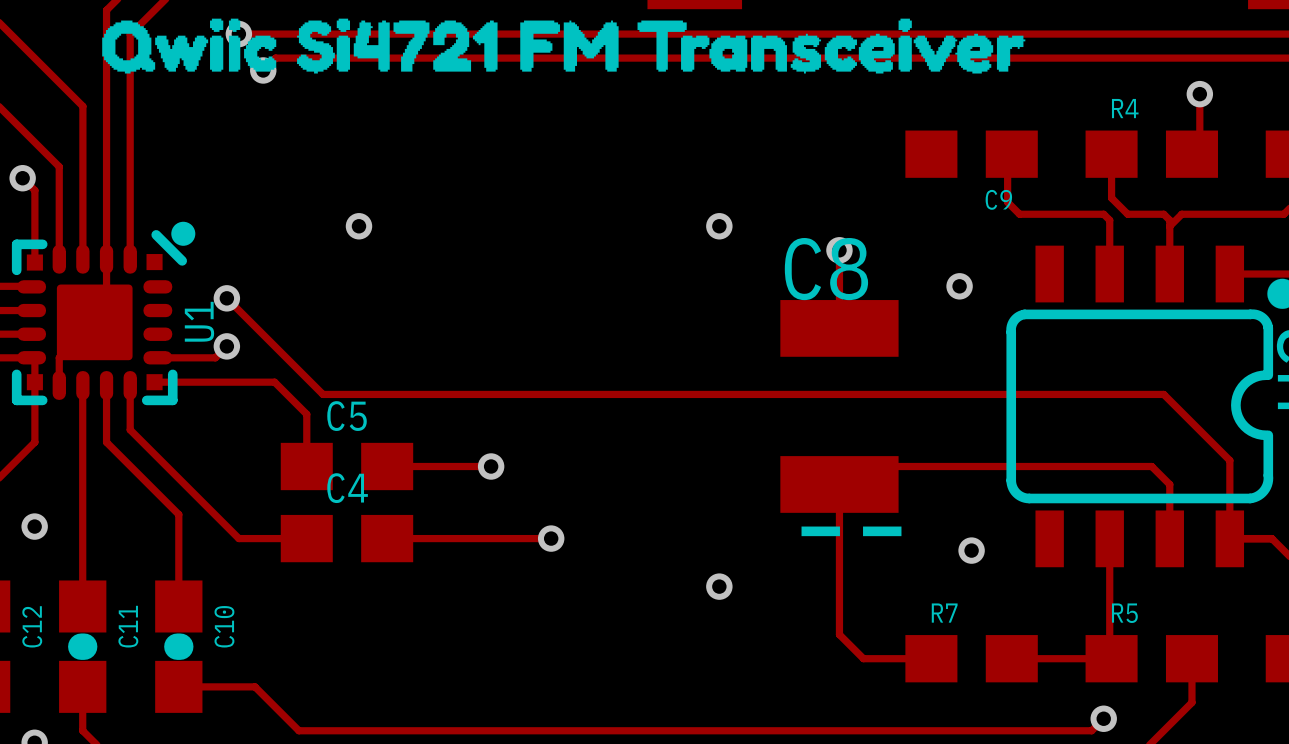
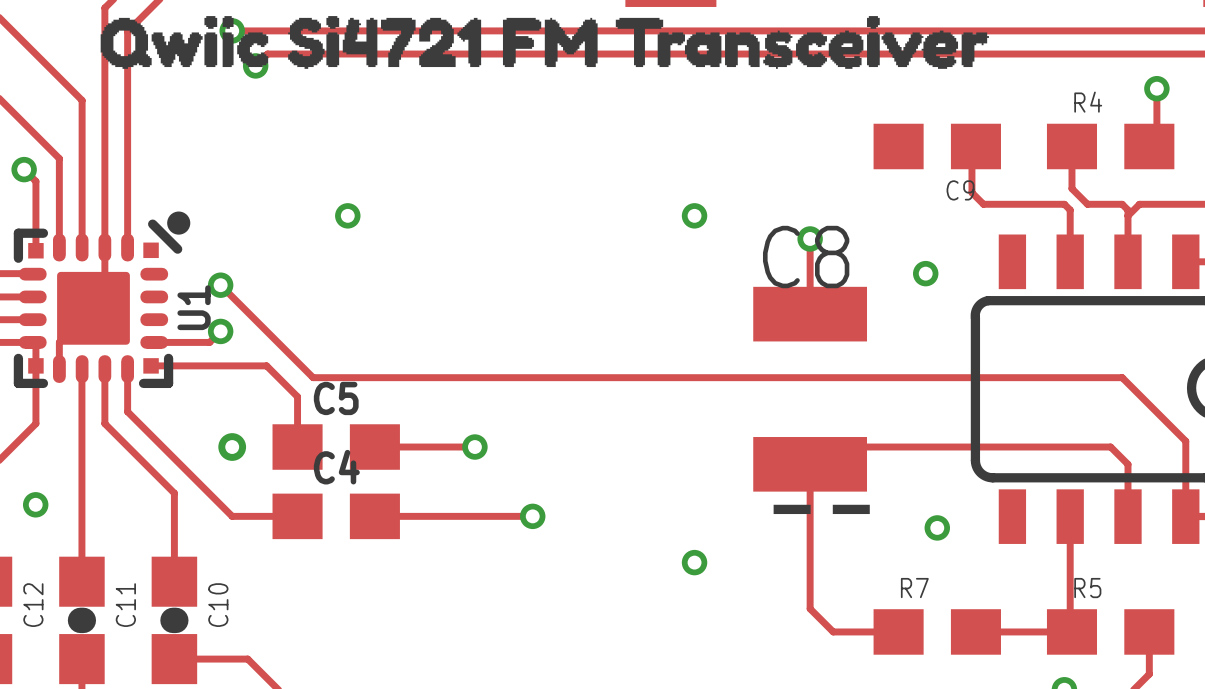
via: none -> (232, 447)

